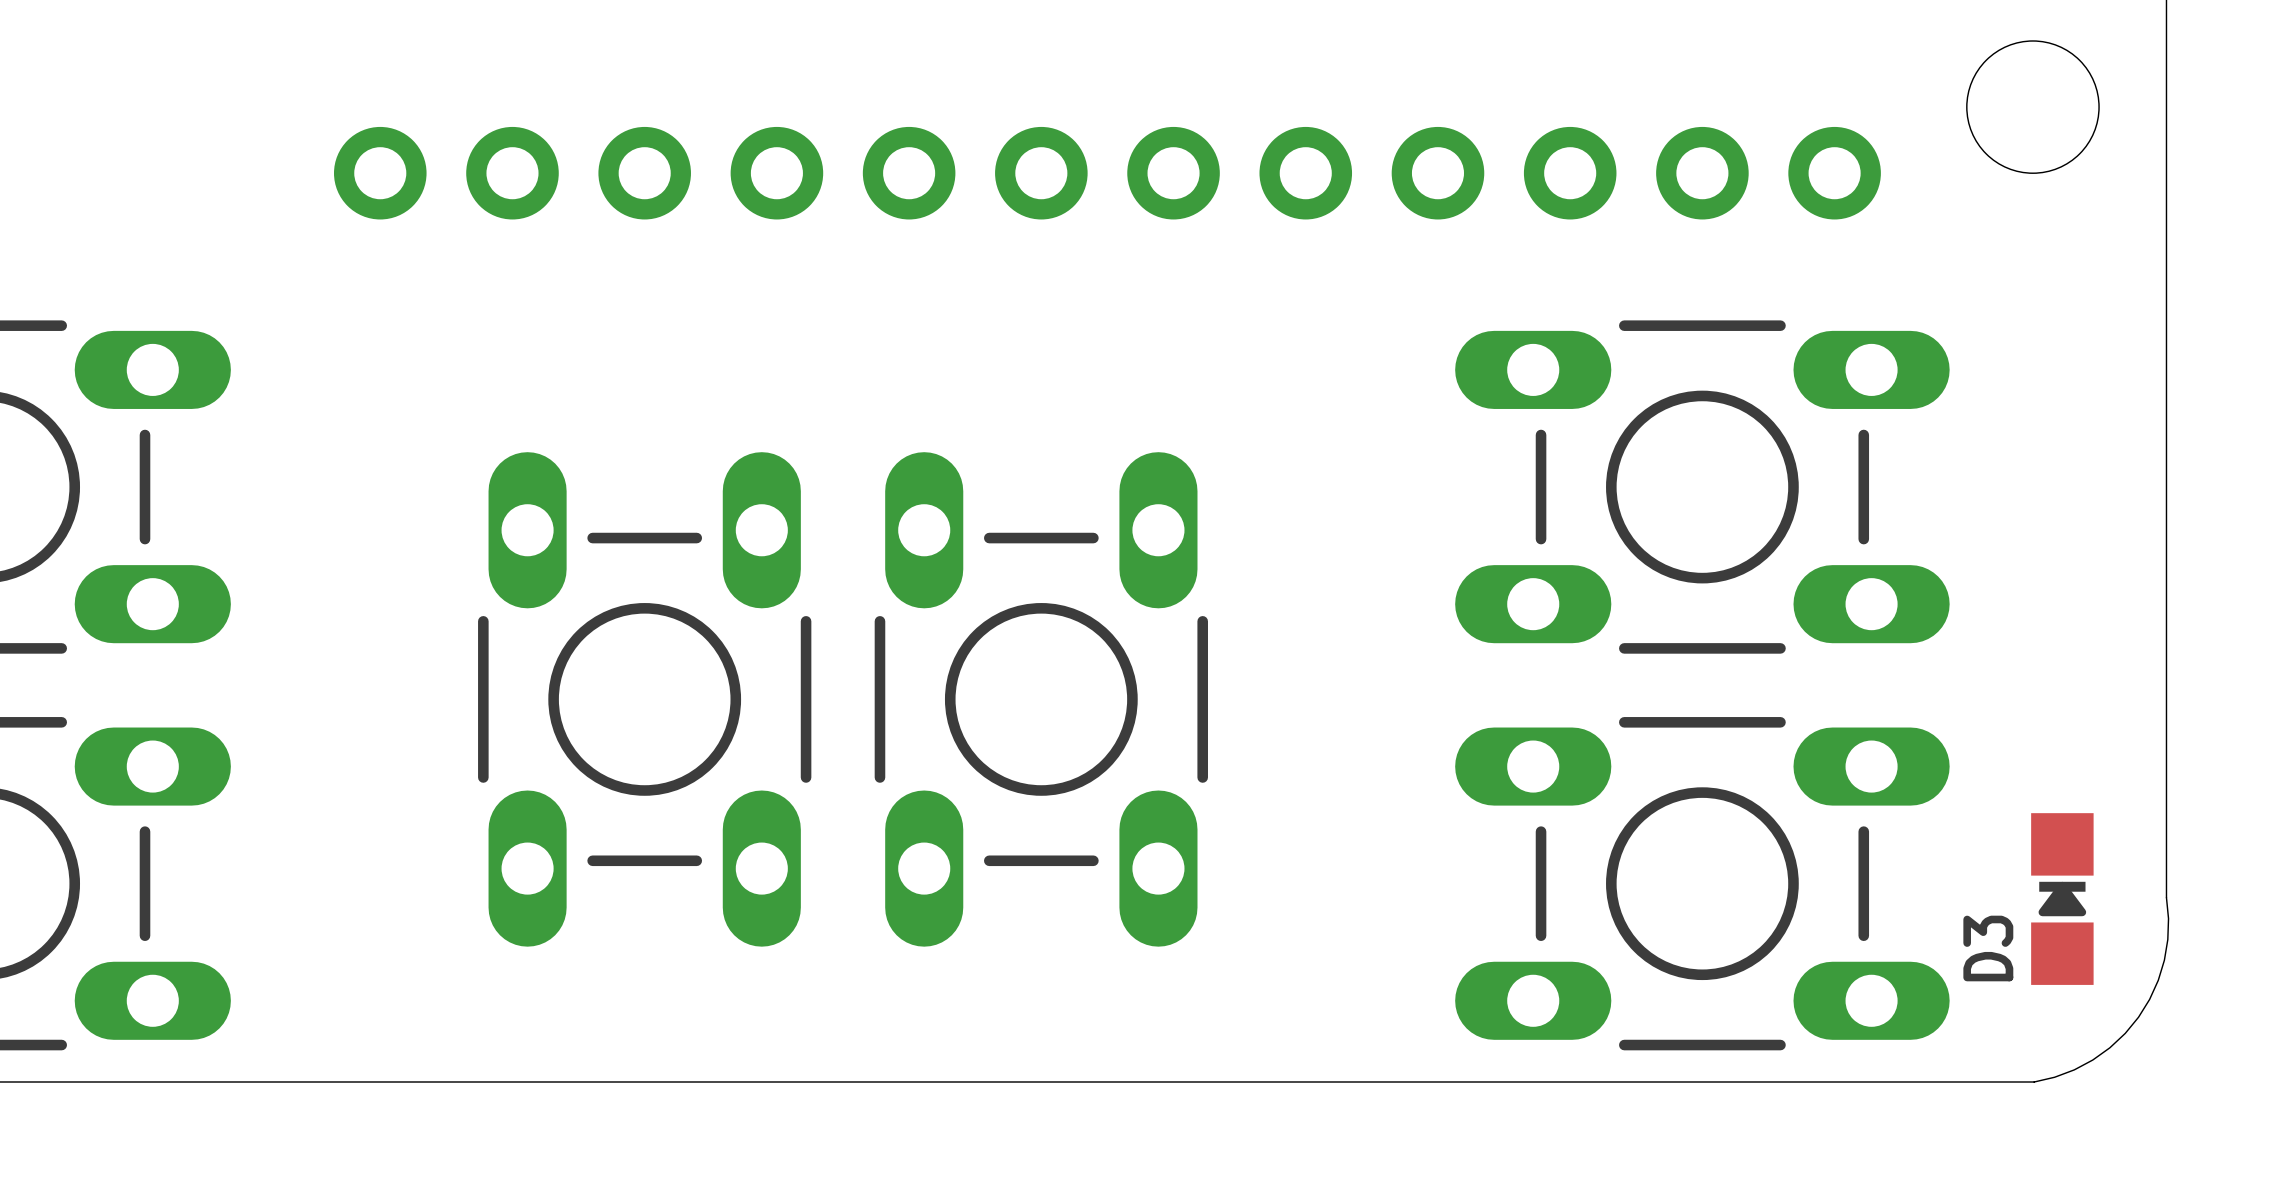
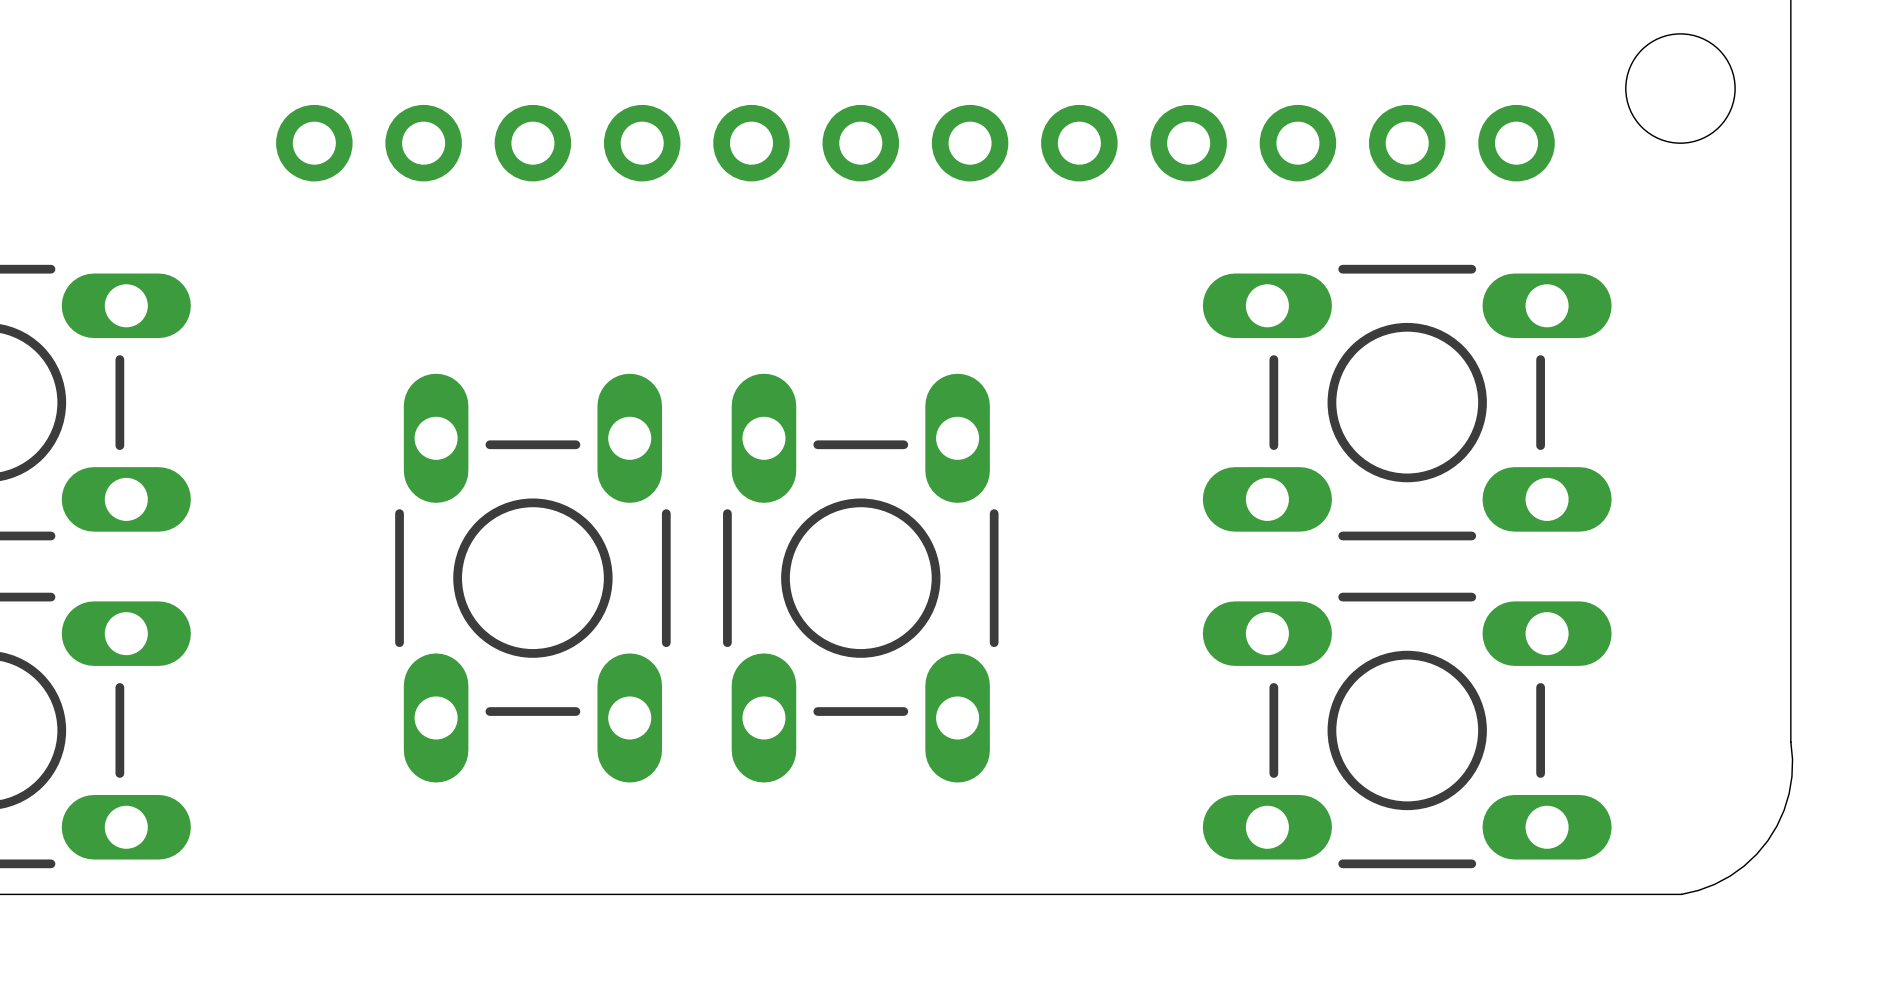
D3: (2062, 899) -> none

